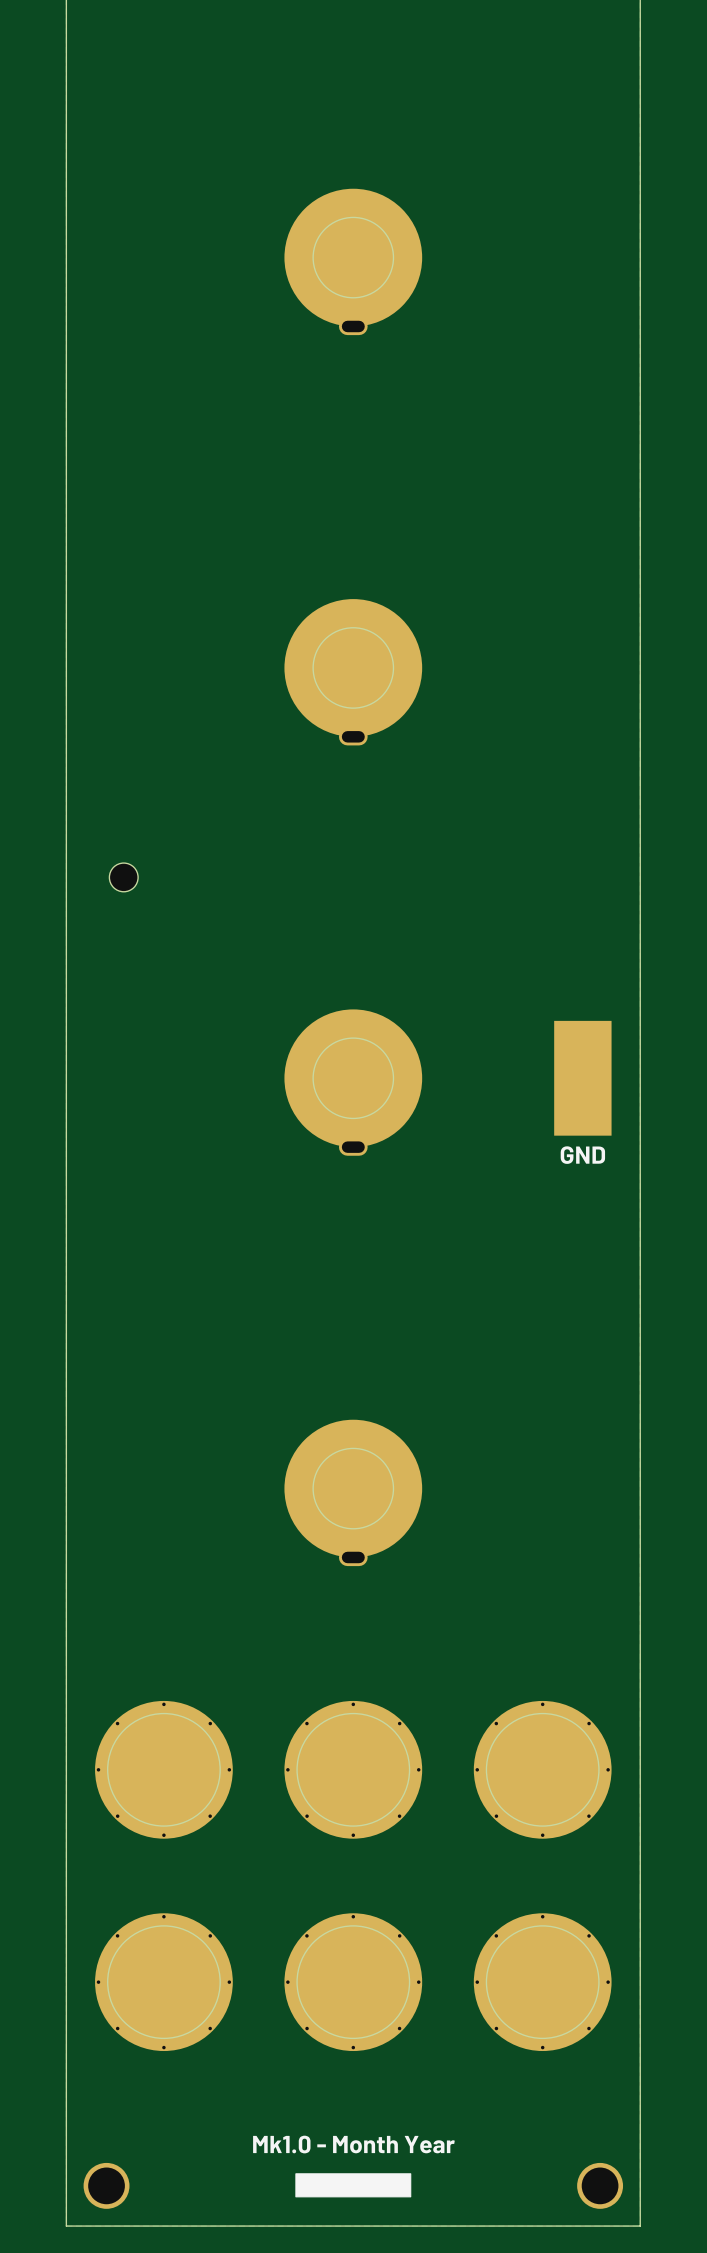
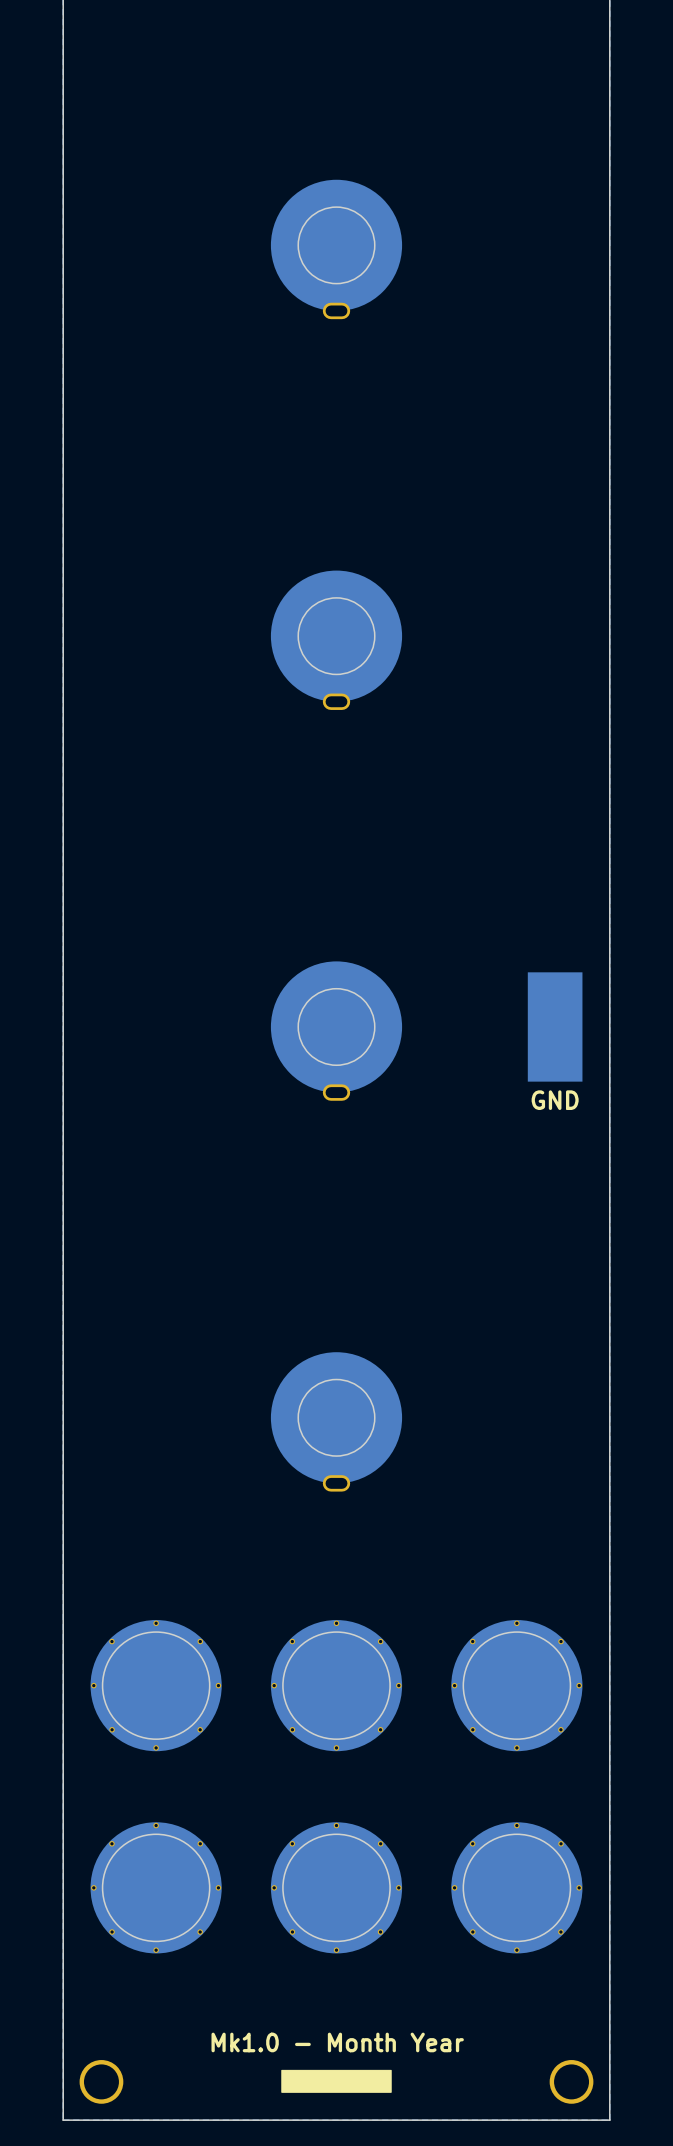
part: (123, 877) -> none

